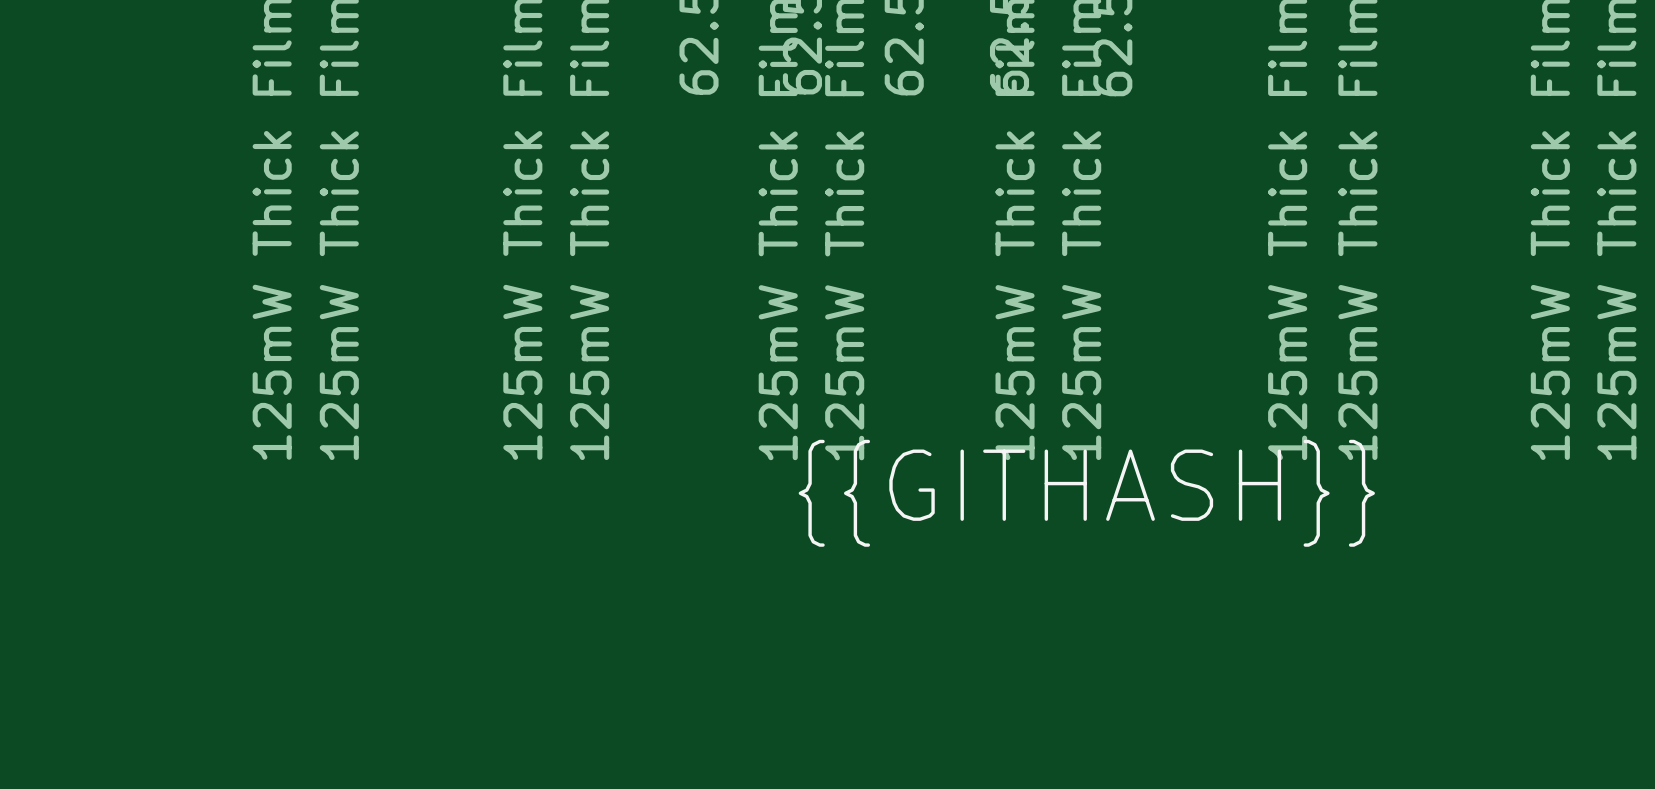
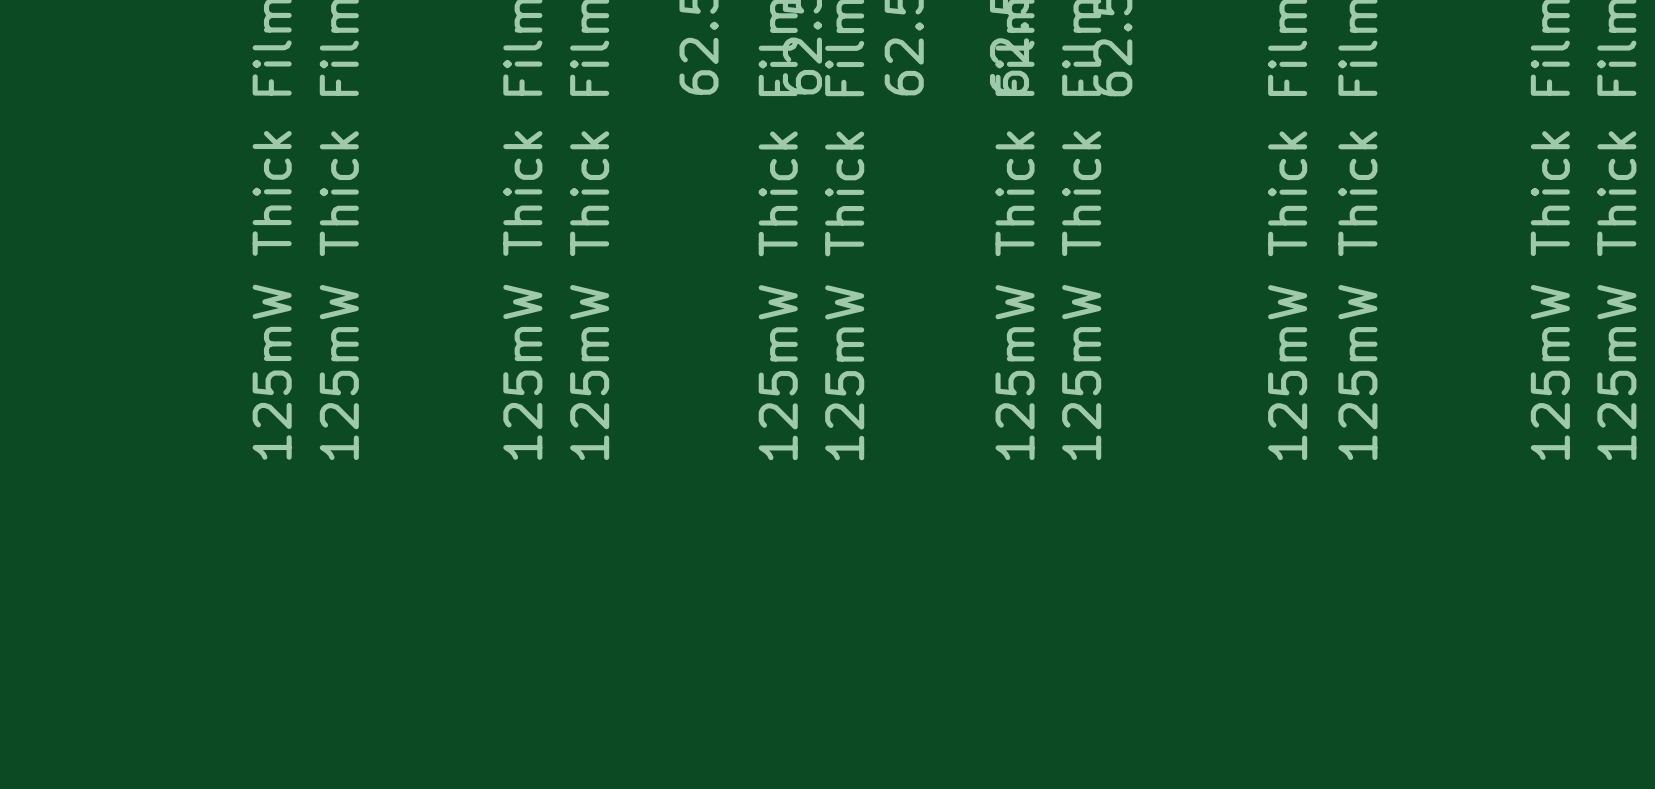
text: {{GITHASH}} (1086, 493) -> none

